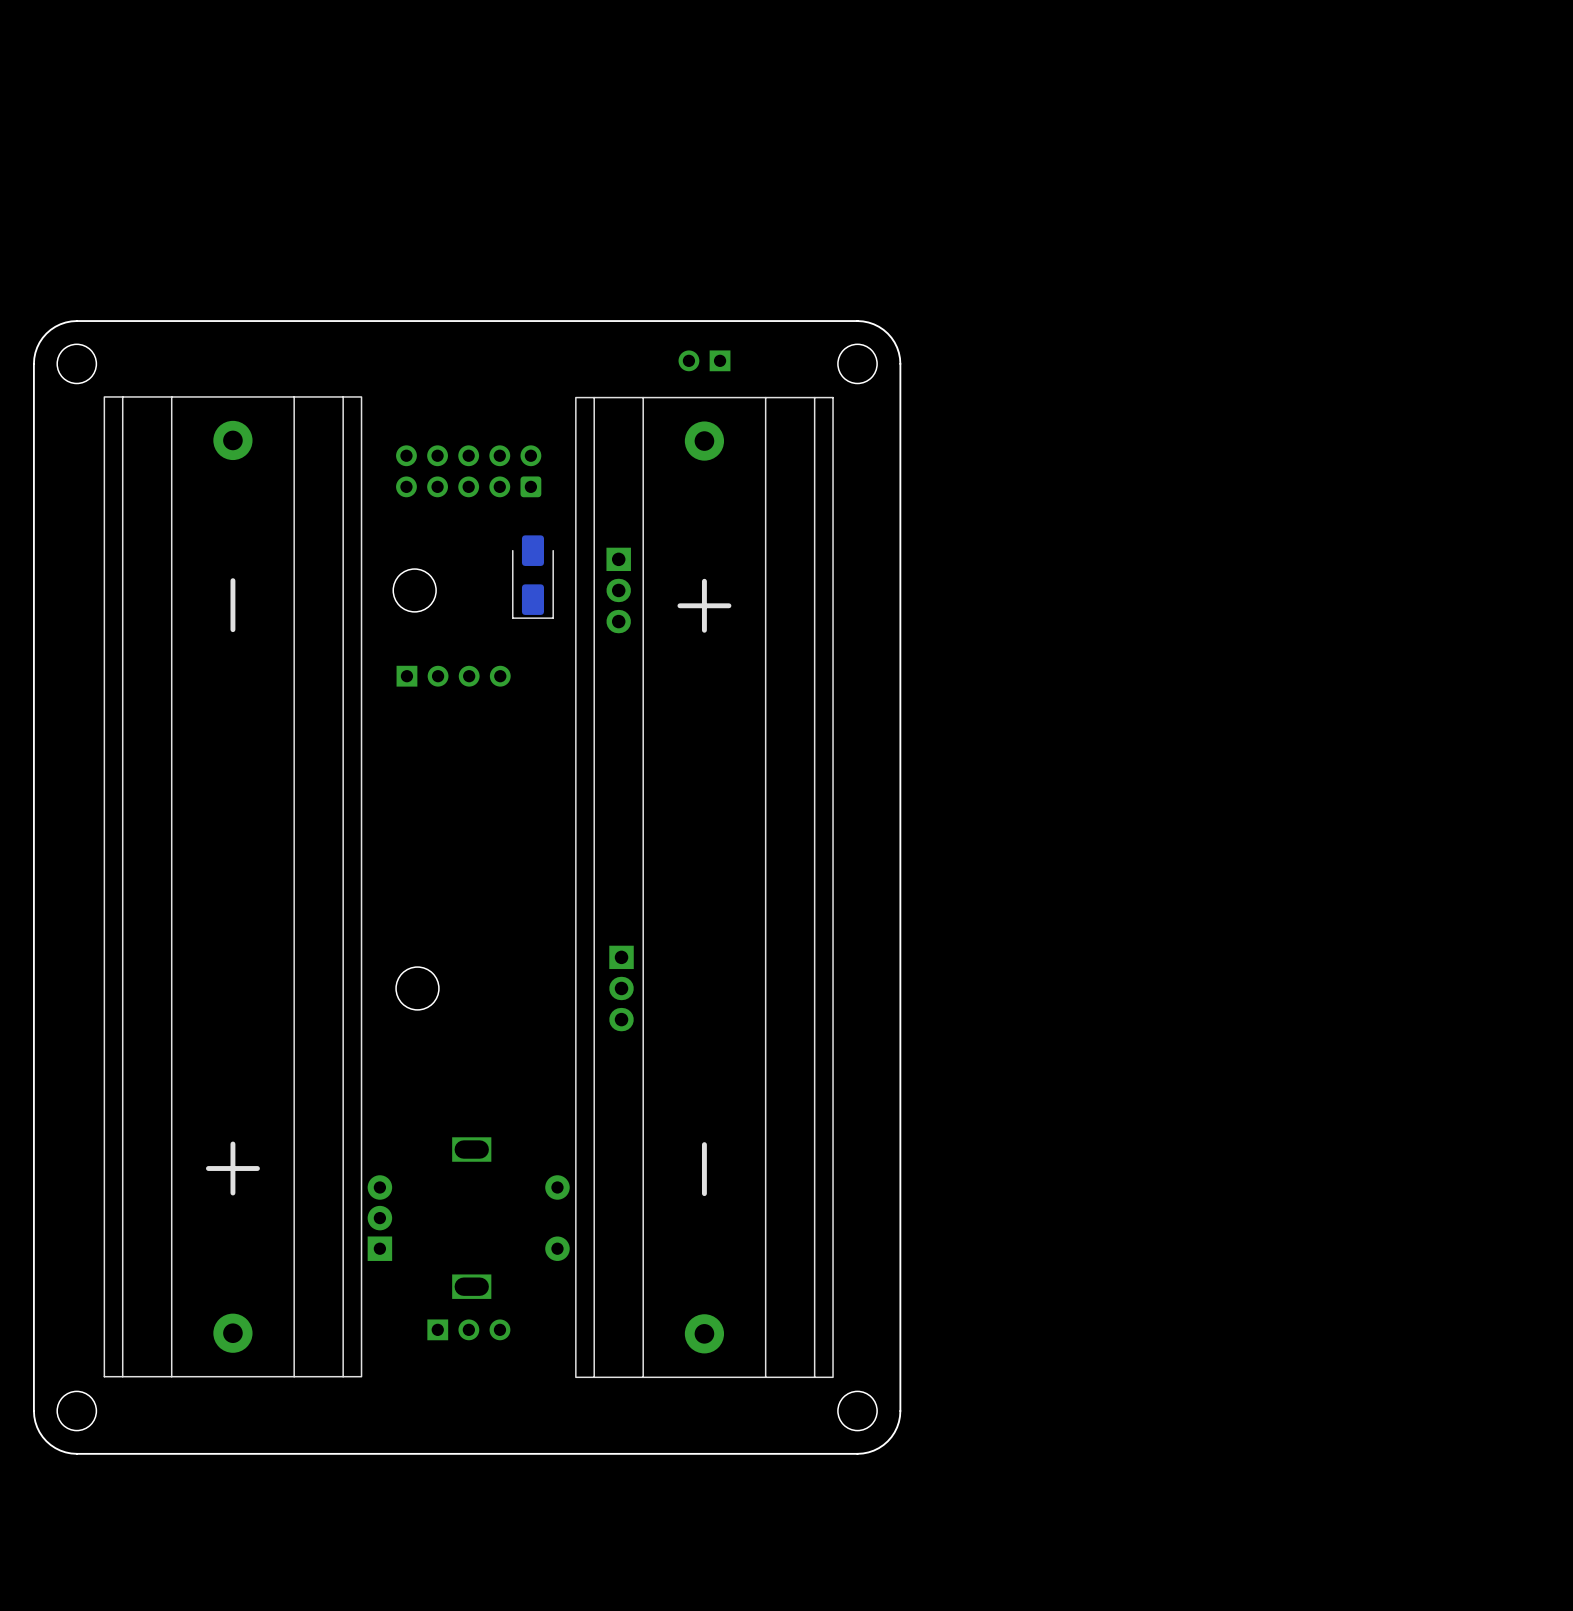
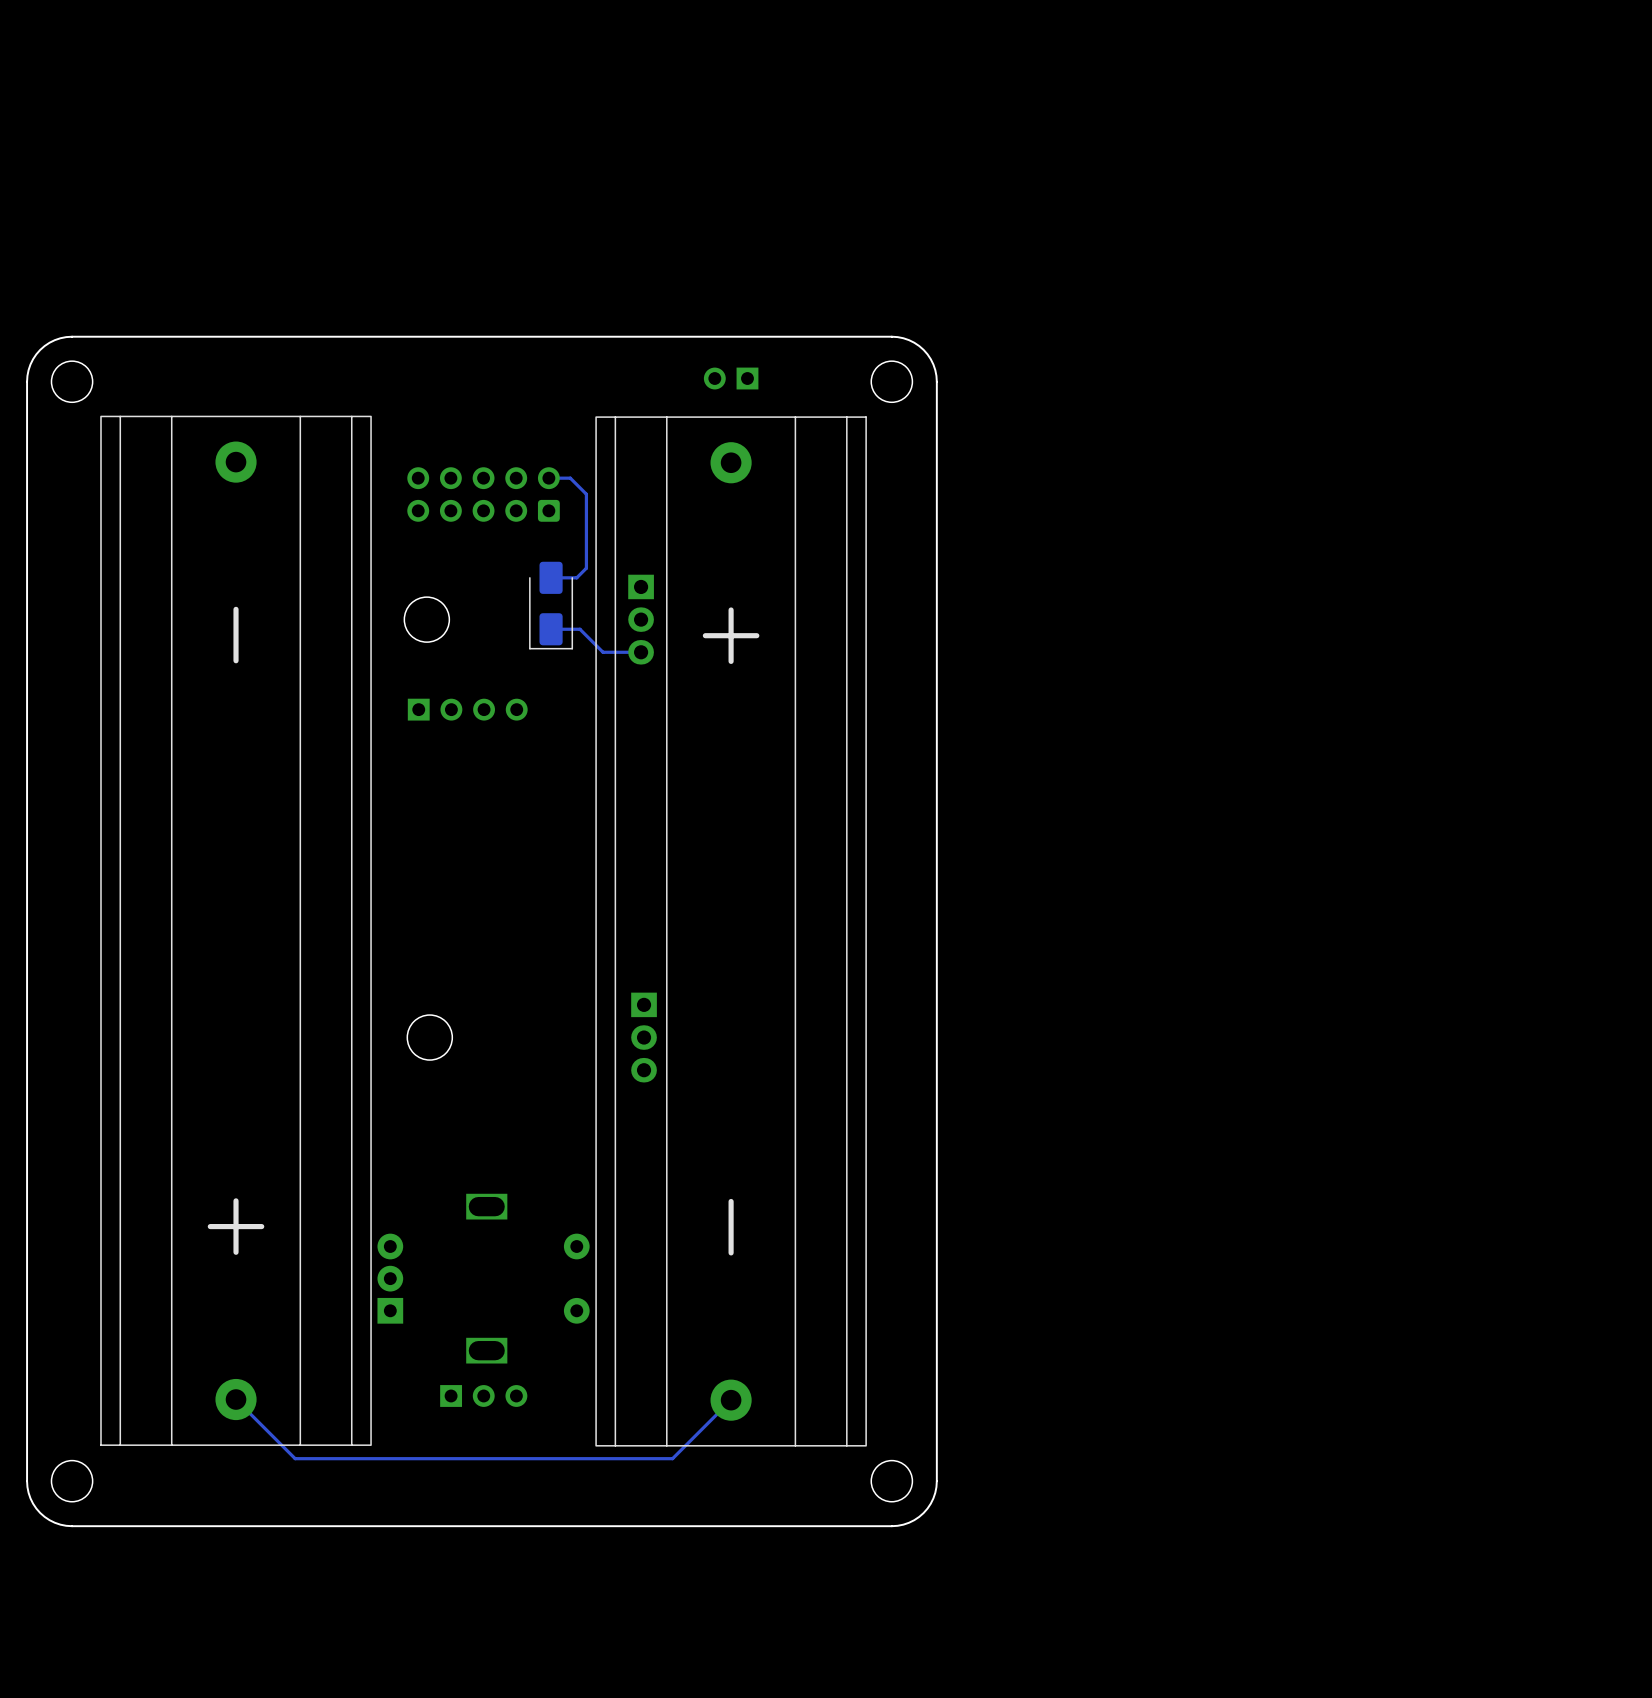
track: none -> (548, 478) (570, 478) (586, 494) (586, 568) (576, 577) (551, 577)
track: none -> (551, 629) (579, 629) (603, 652) (641, 652)
track: none -> (236, 1399) (295, 1458) (672, 1458) (731, 1400)

